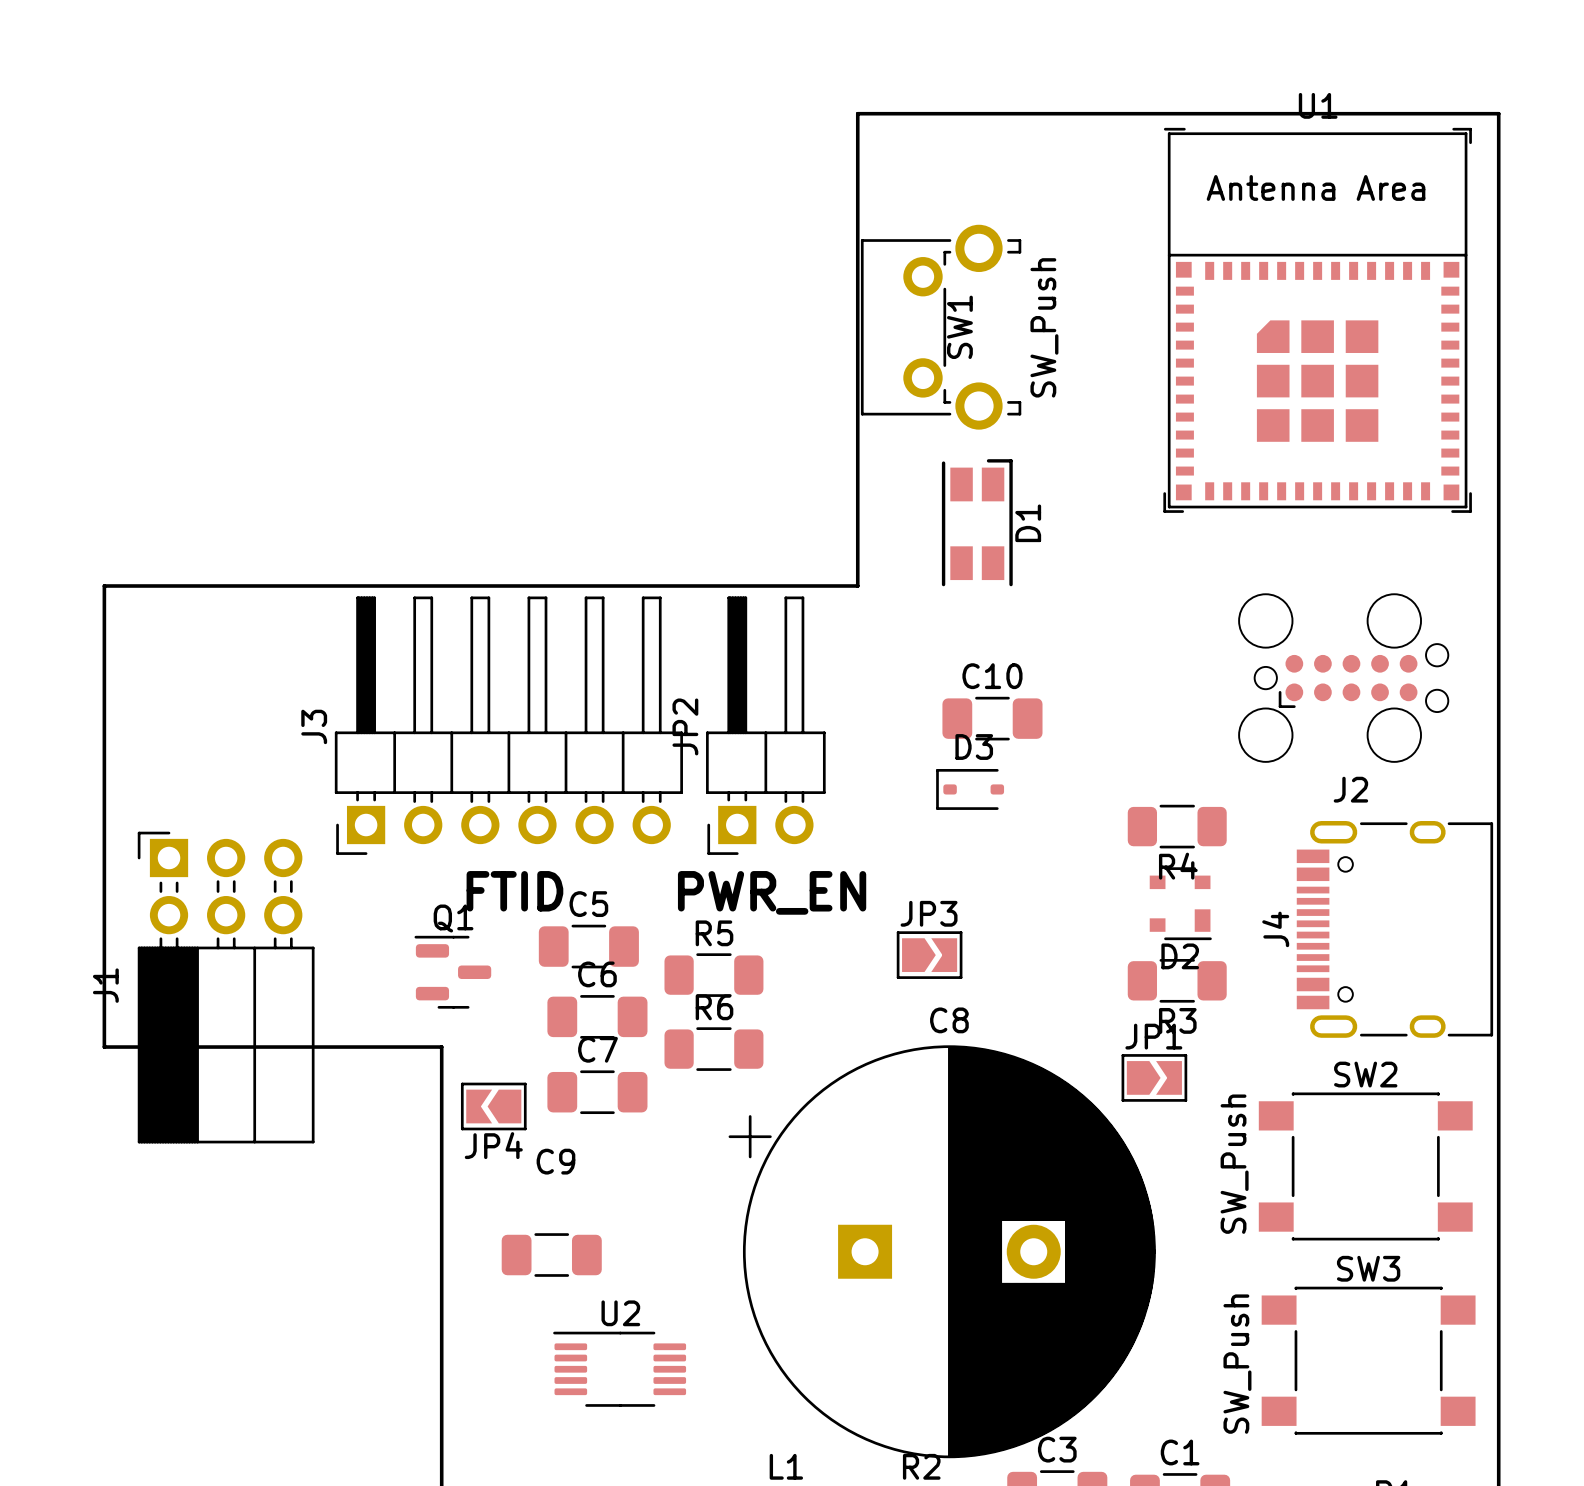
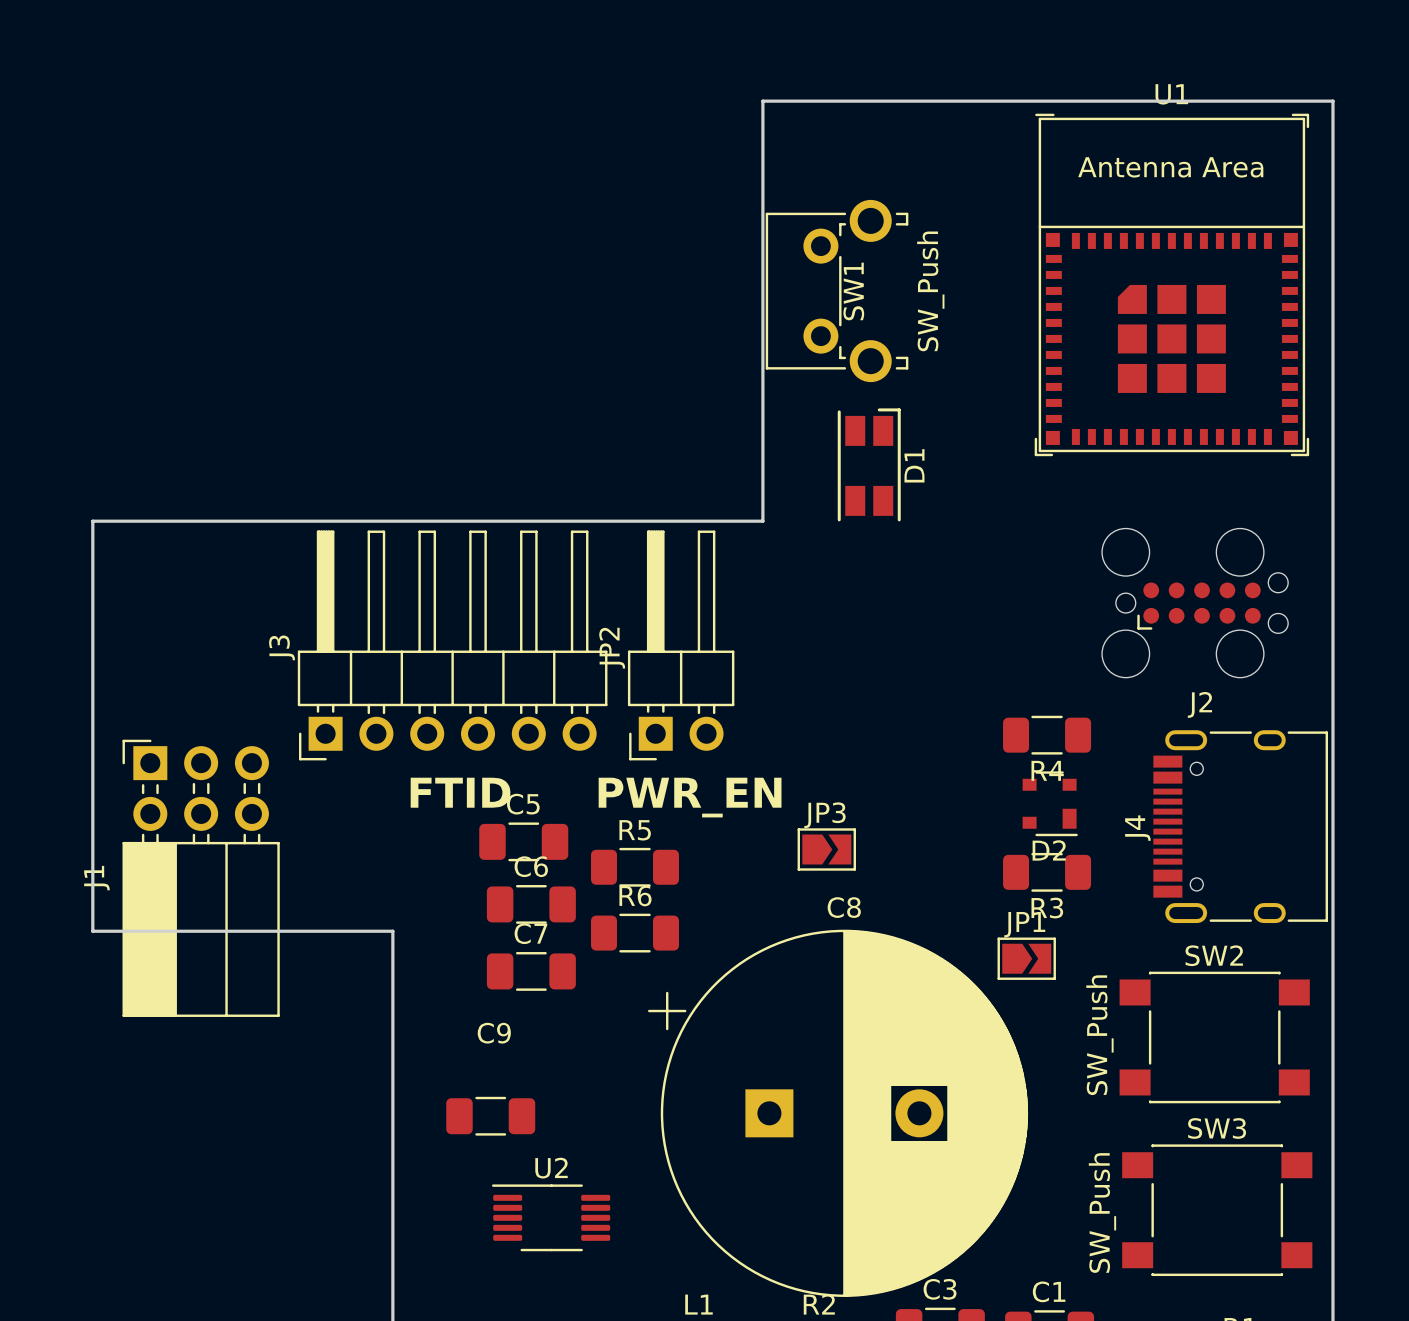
C10: (992, 718) -> none
D3: (970, 789) -> none
Q1: (452, 972) -> none
JP4: (493, 1106) -> none

